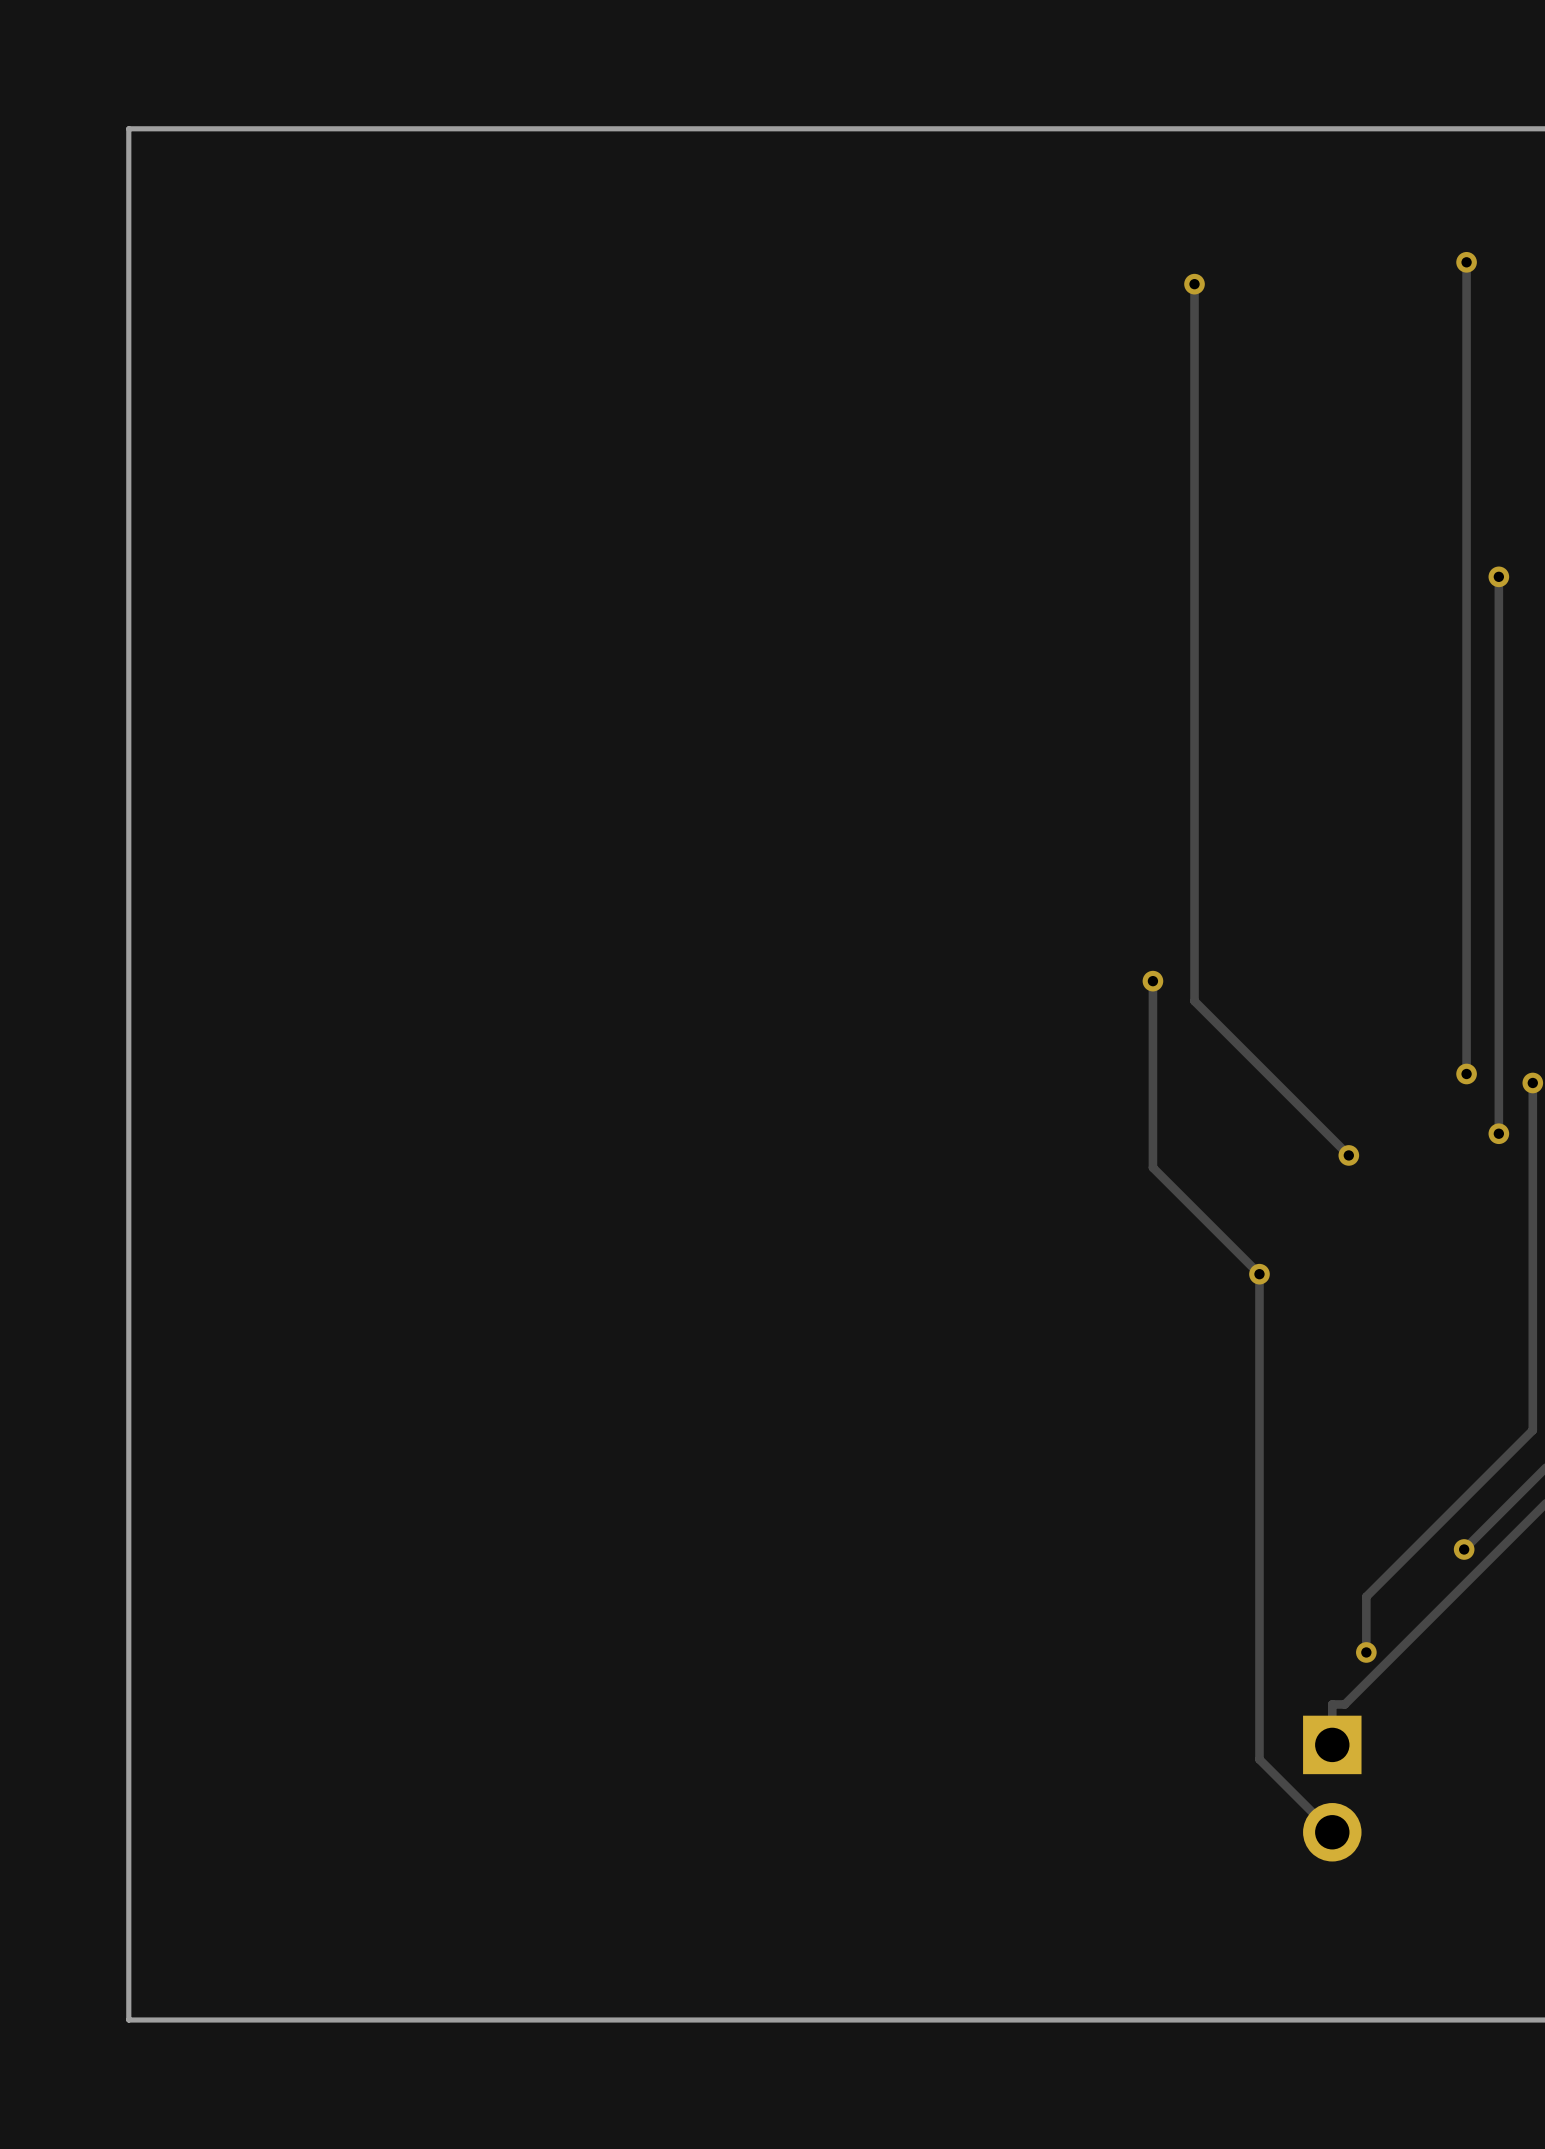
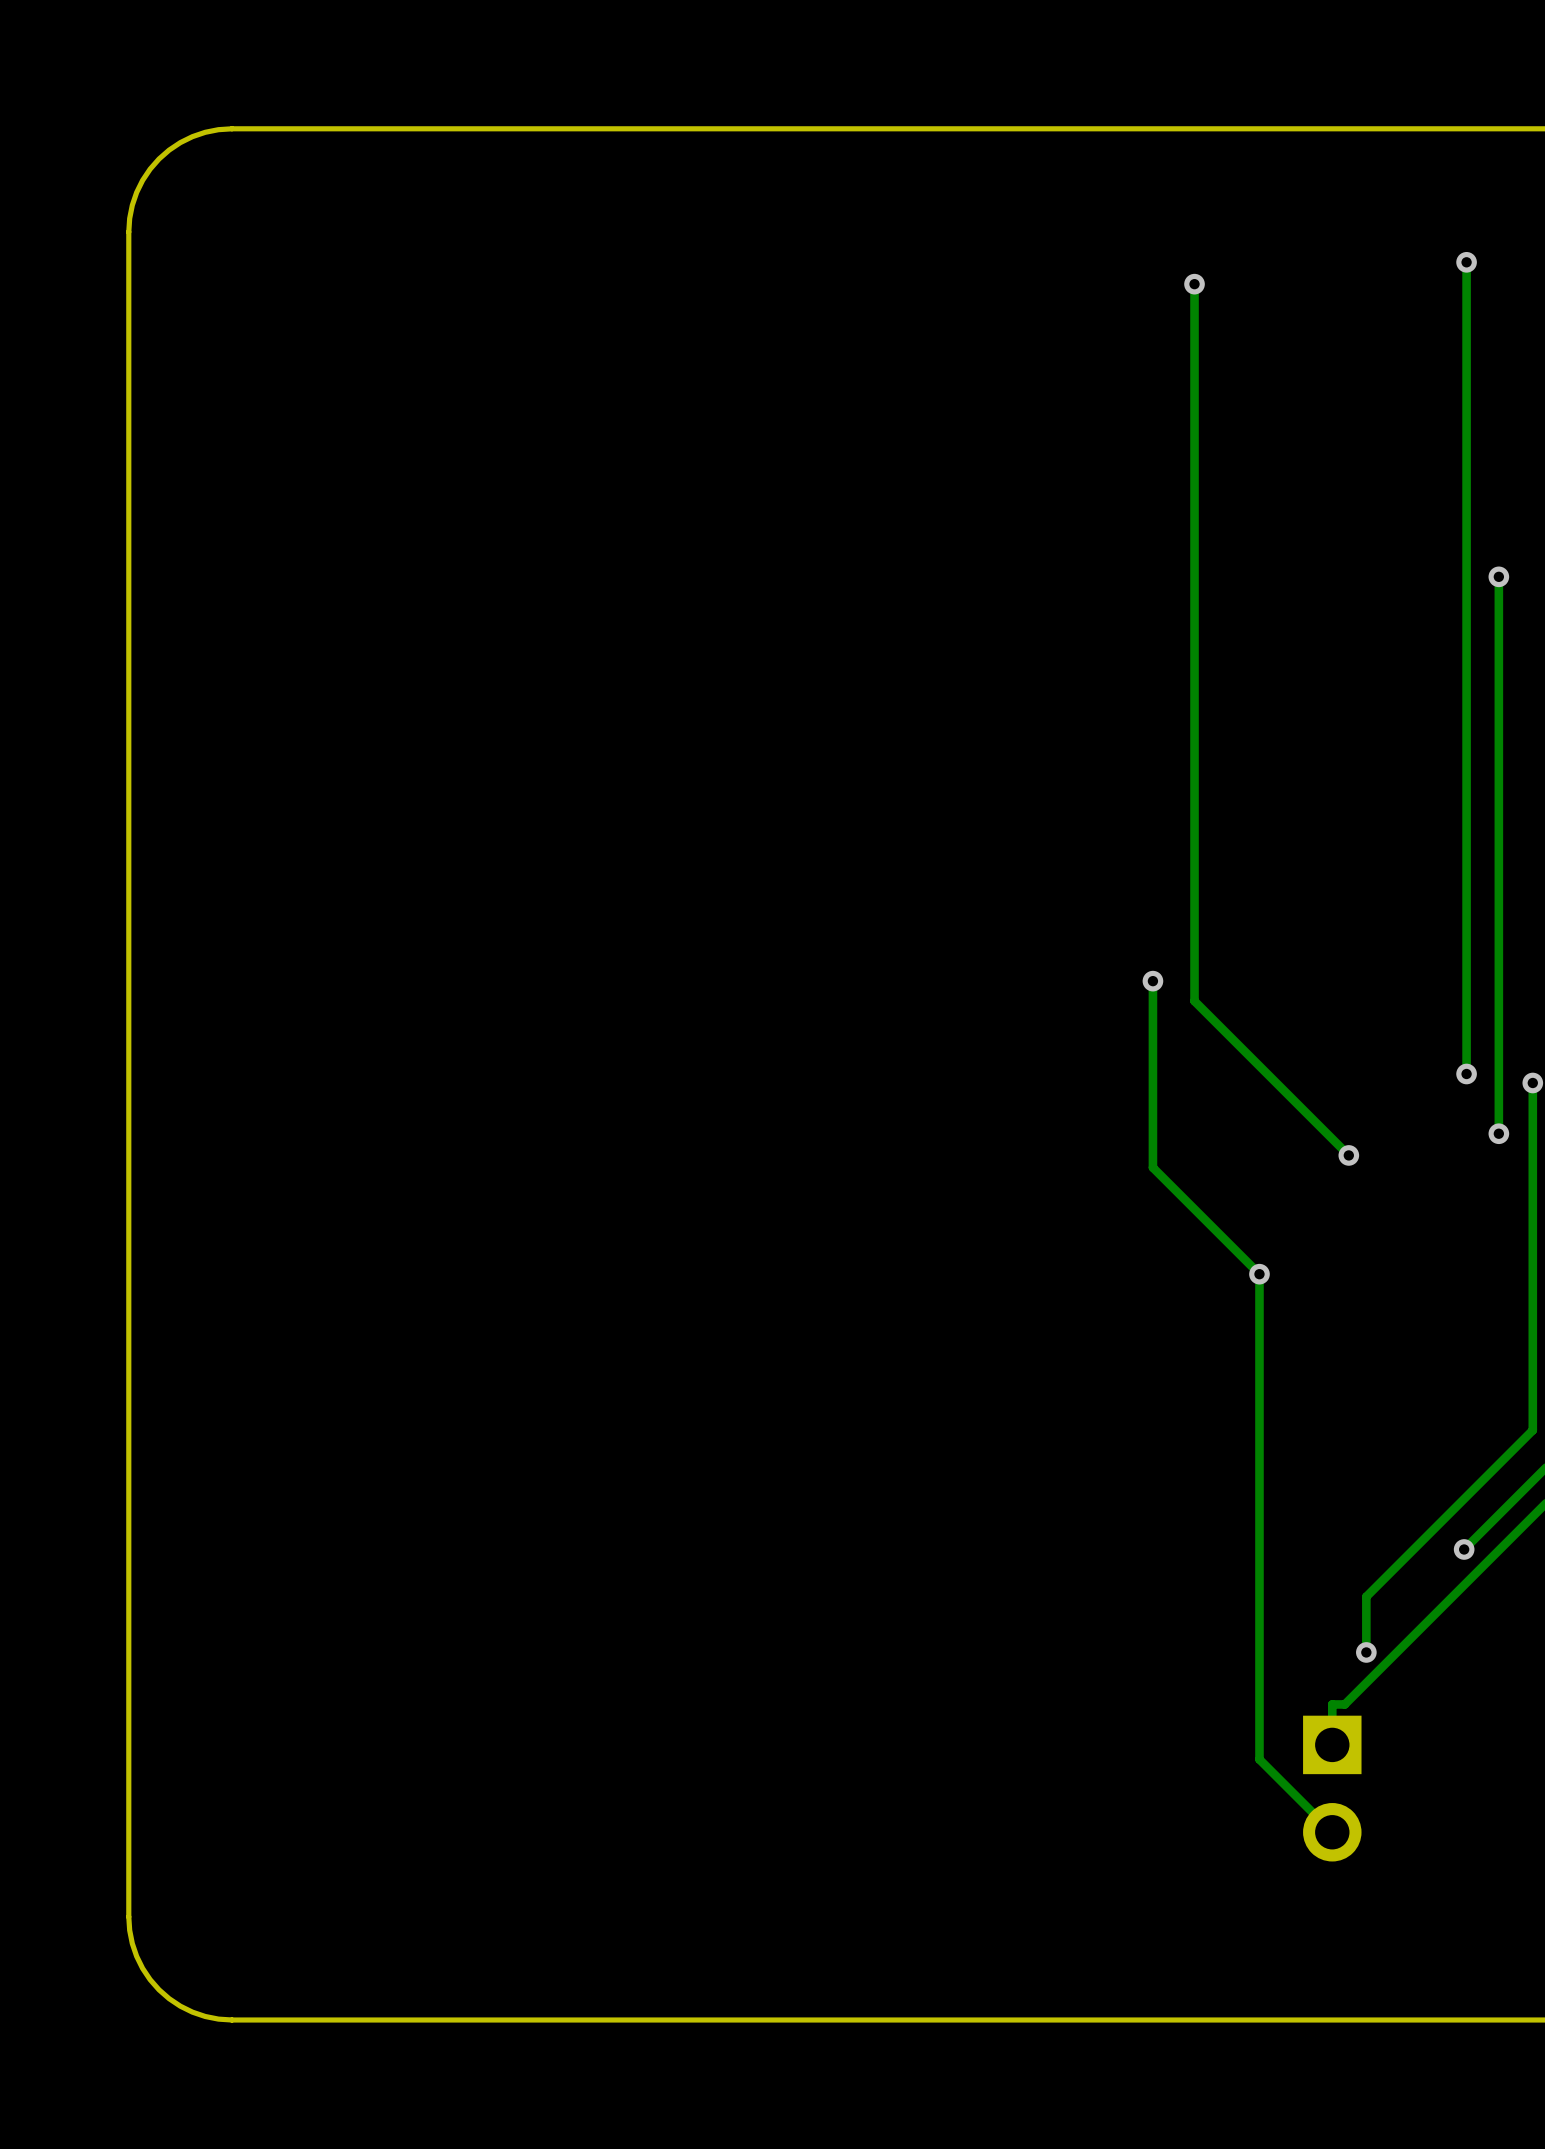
board edge: (231, 128) (128, 128) (128, 231) -> (231, 128) (218, 129) (192, 136) (180, 142) (159, 159) (142, 180) (136, 192) (129, 218) (128, 231)
board edge: (128, 1916) (128, 2020) (231, 2020) -> (128, 1916) (132, 1943) (136, 1956) (142, 1968) (159, 1989) (180, 2006) (192, 2012) (218, 2019) (231, 2020)

